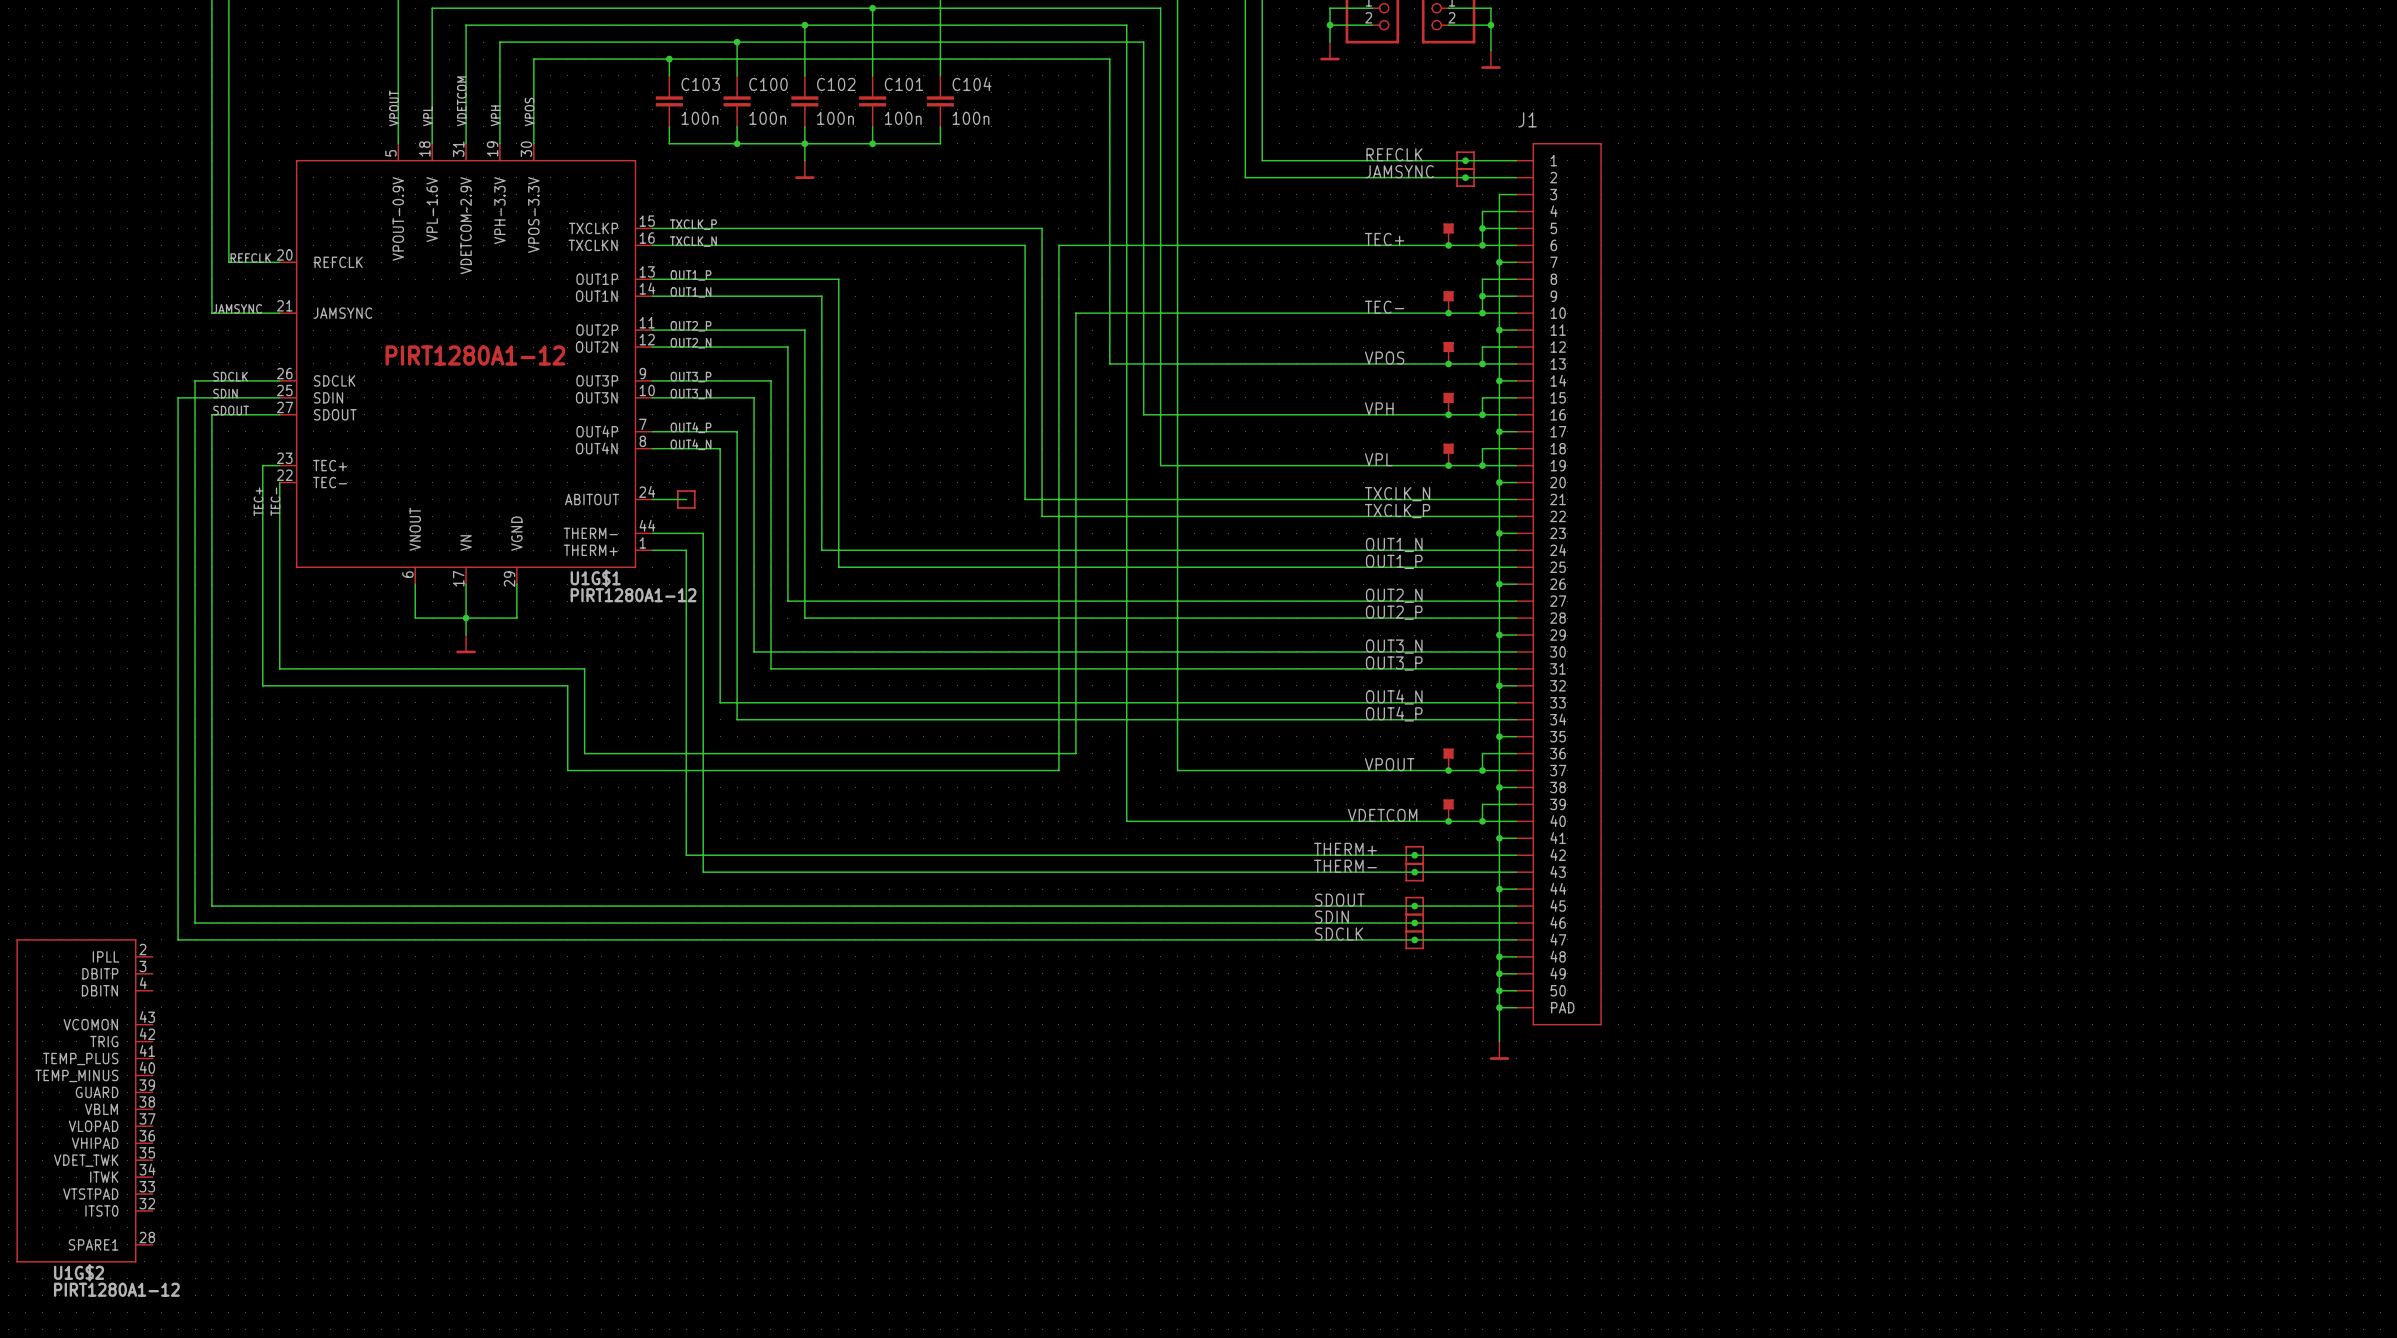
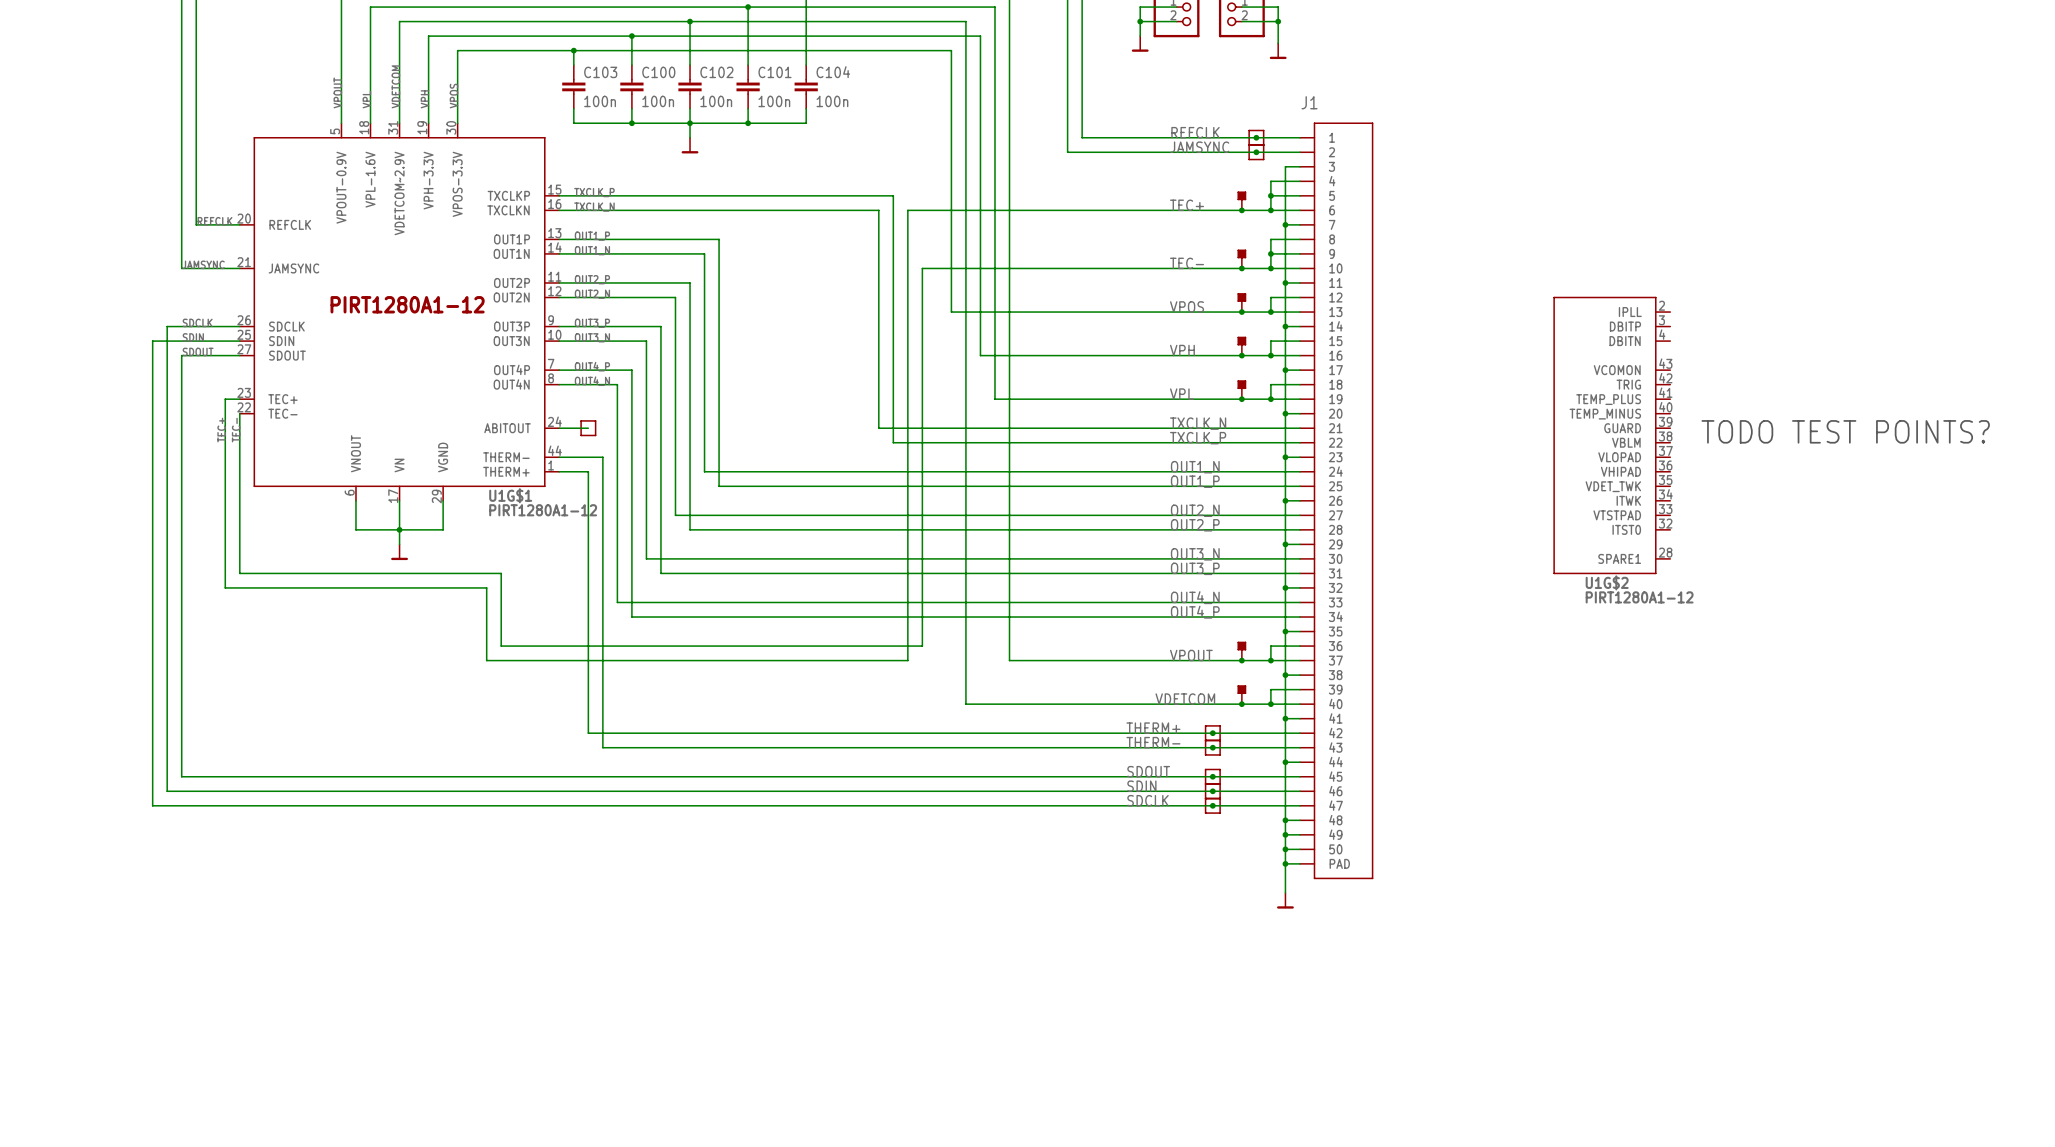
text: none -> TODO TEST POINTS? (1845, 431)
U1G$2 position: (84, 1100) -> (1611, 435)

